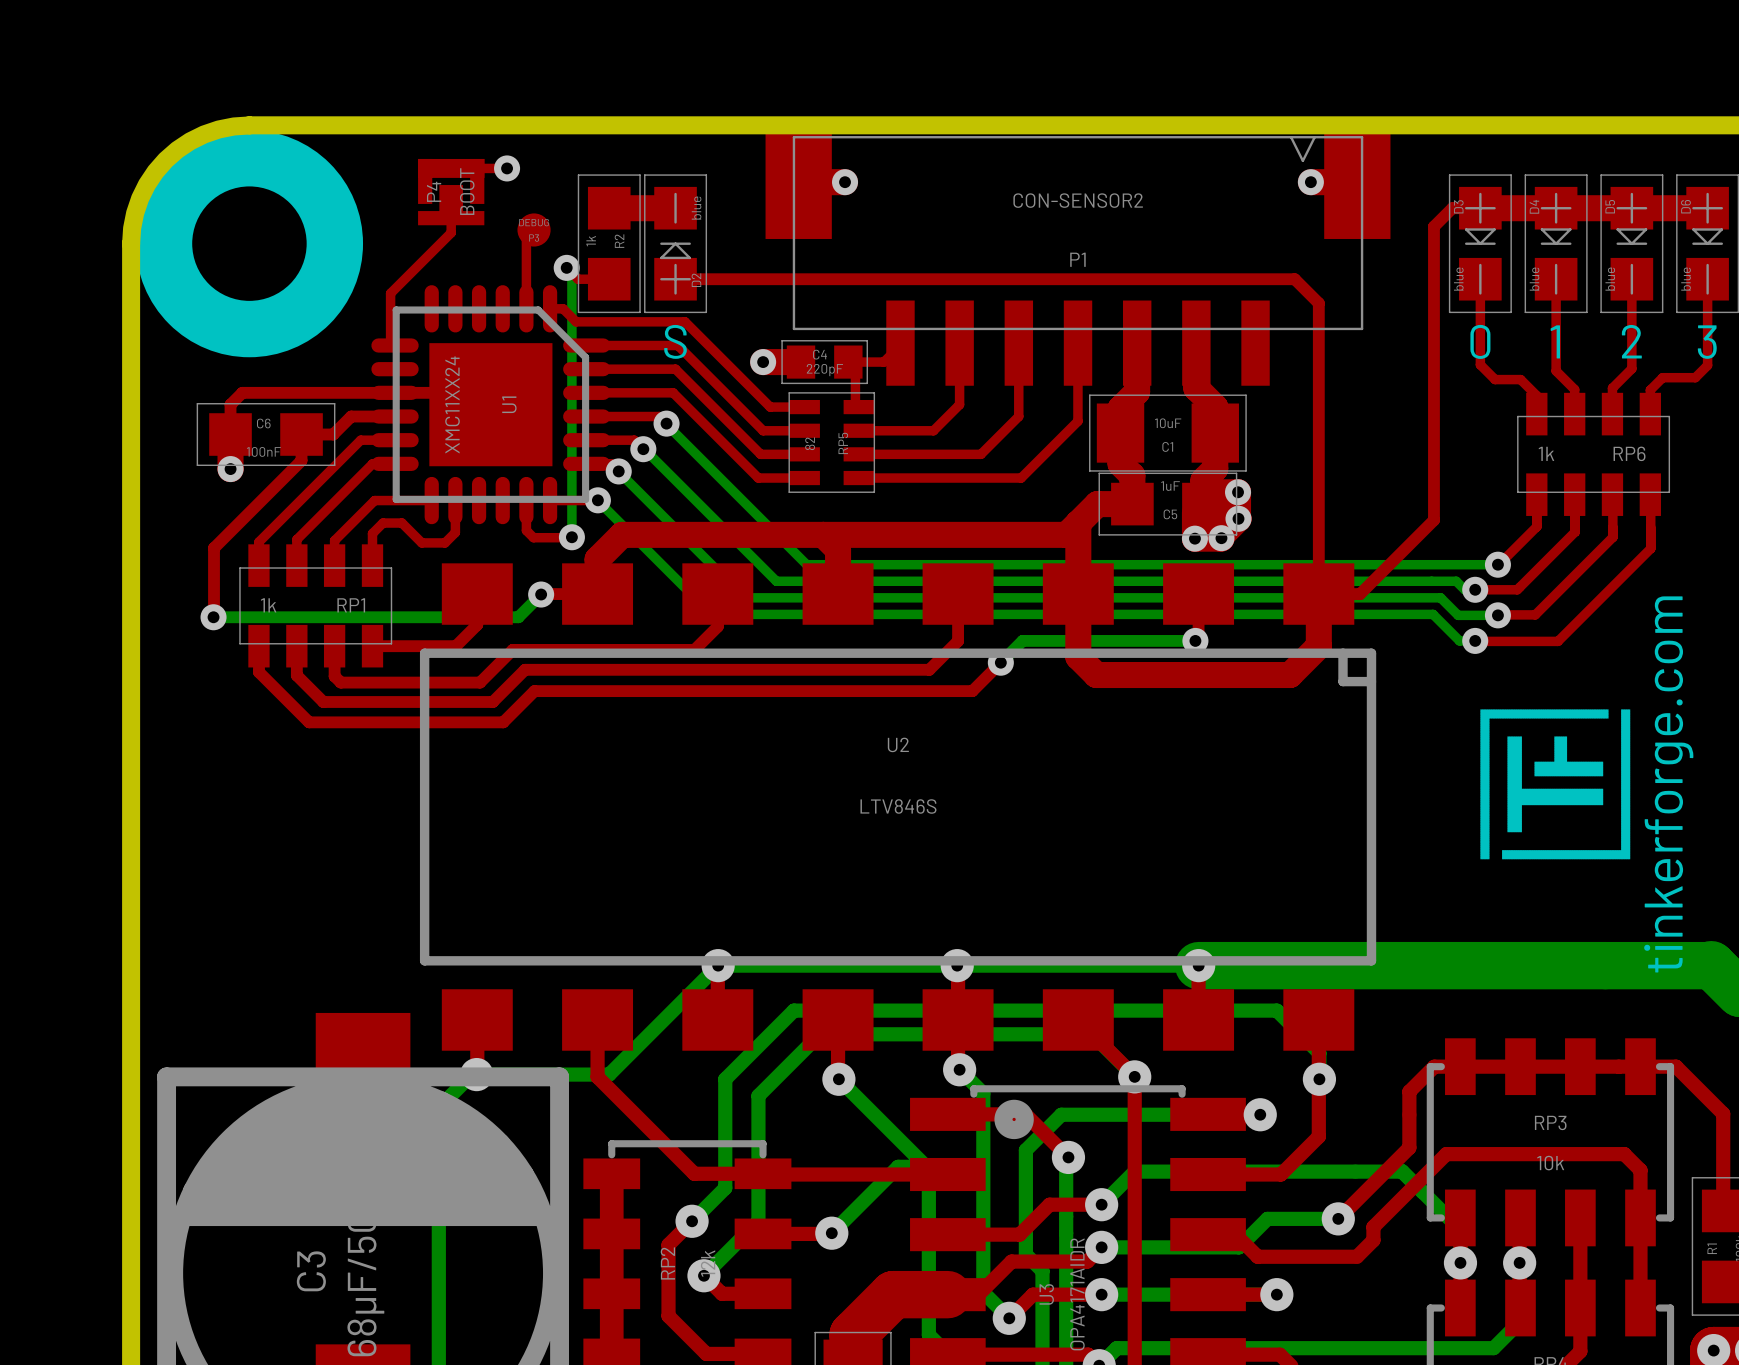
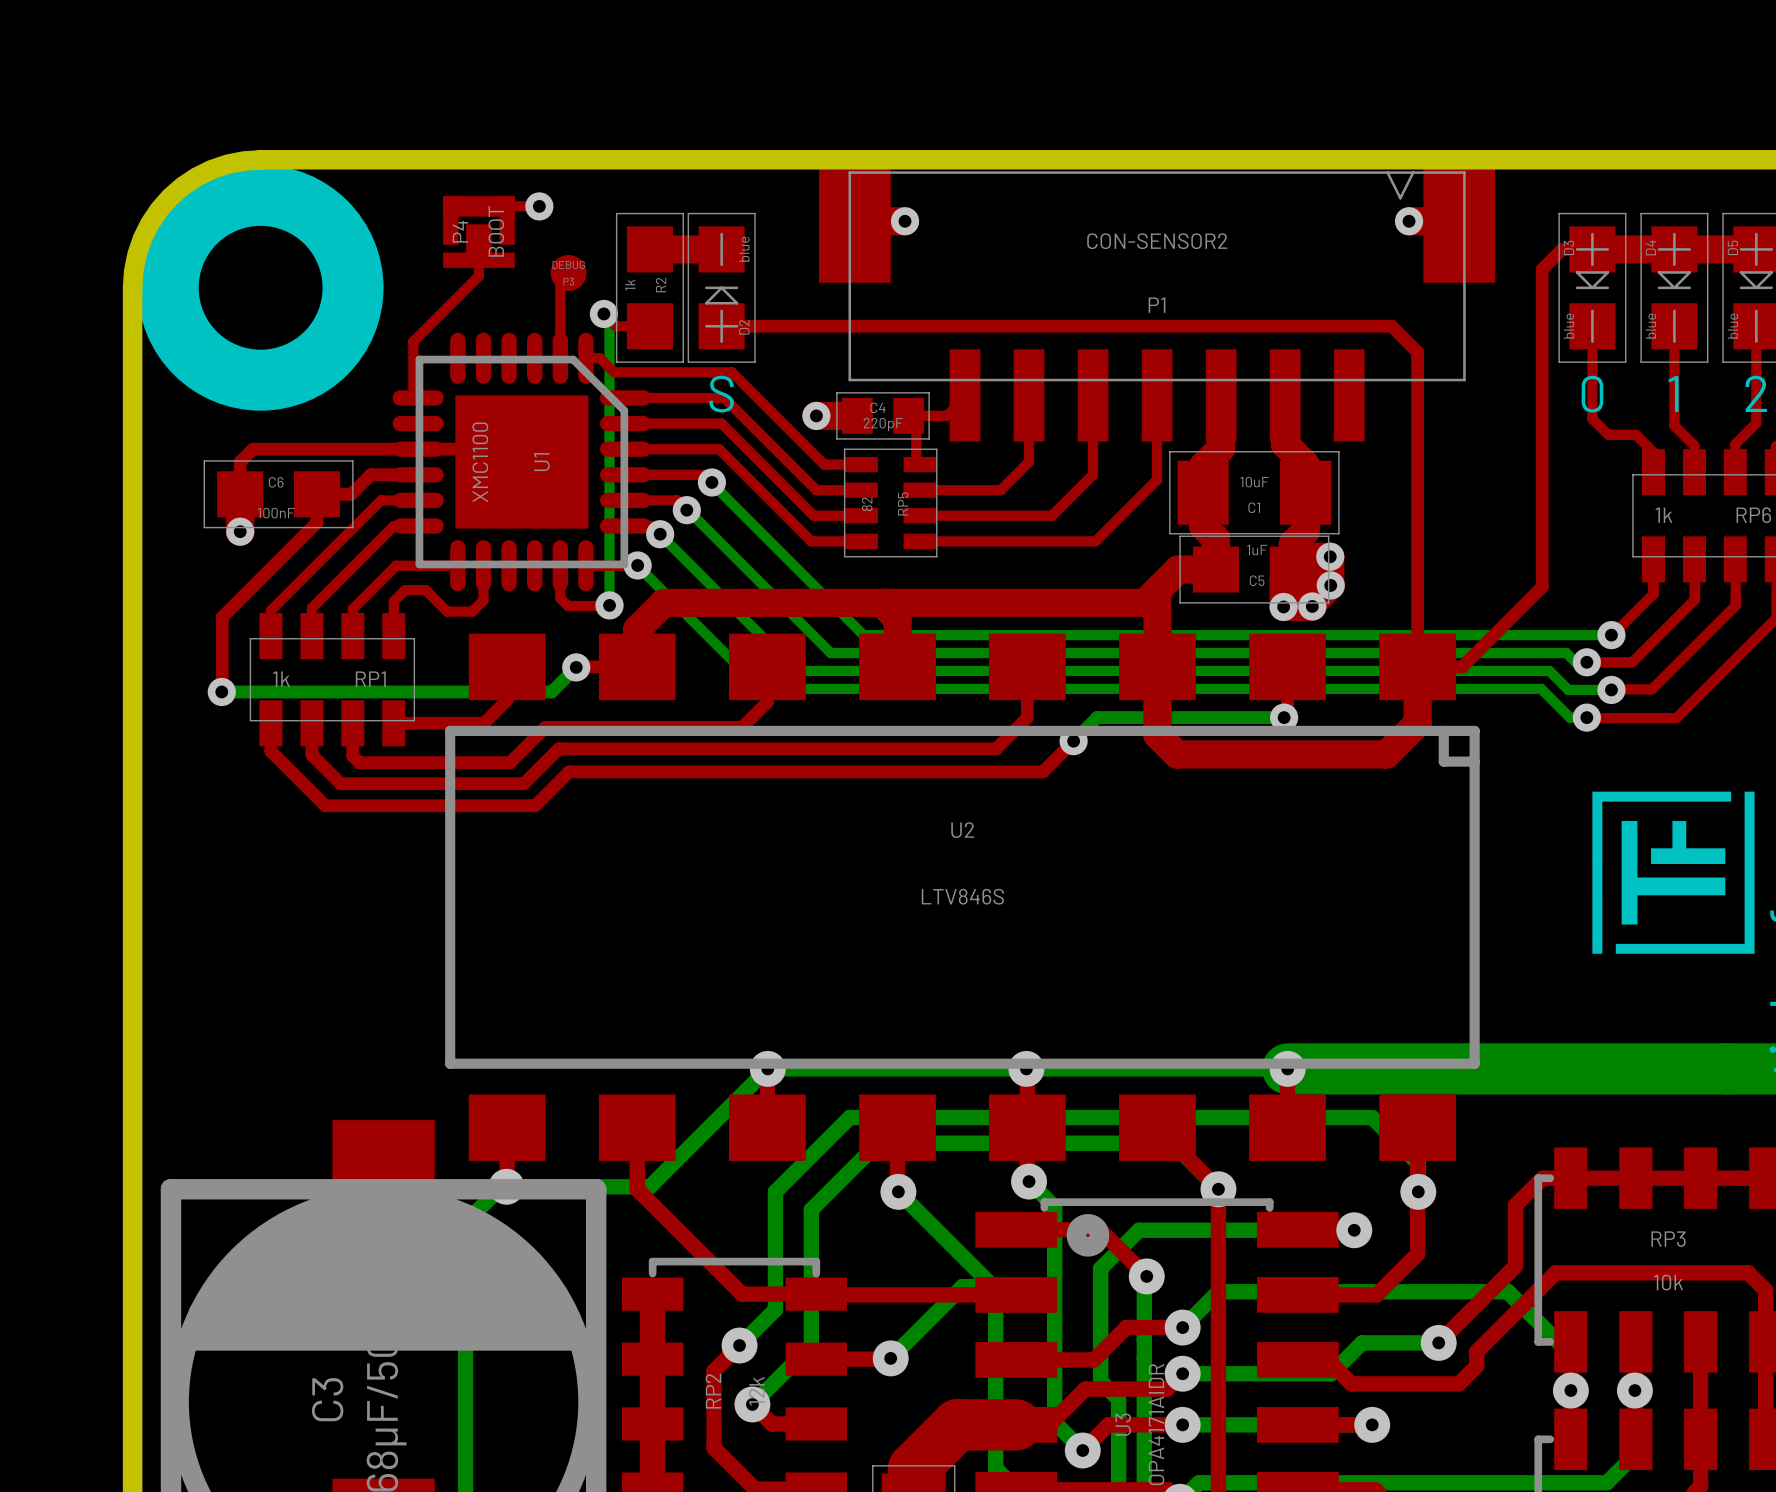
U1 value: XMC11XX24 (452, 404) -> XMC1100 (480, 462)

